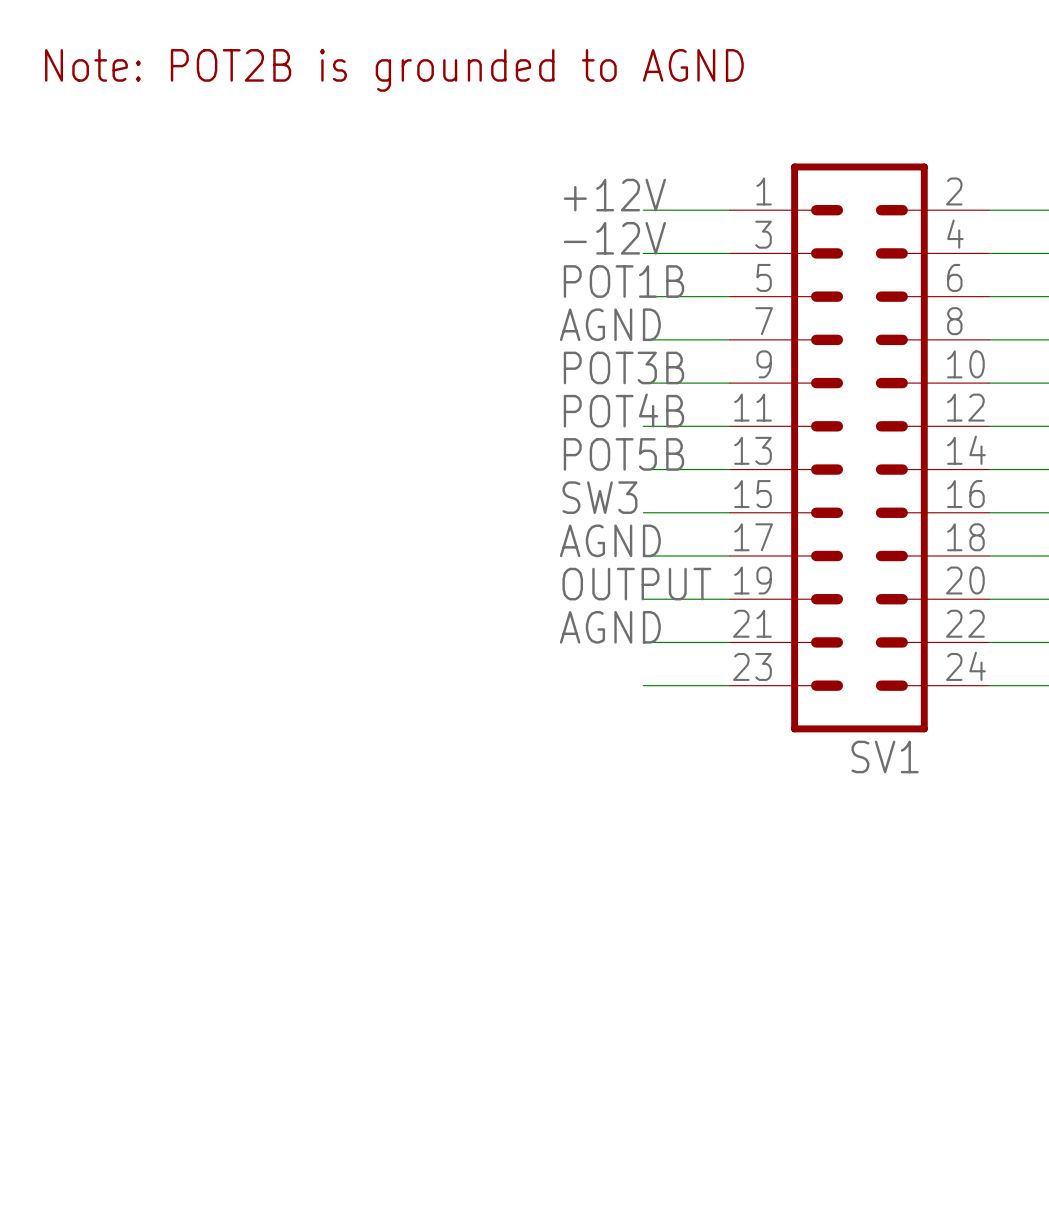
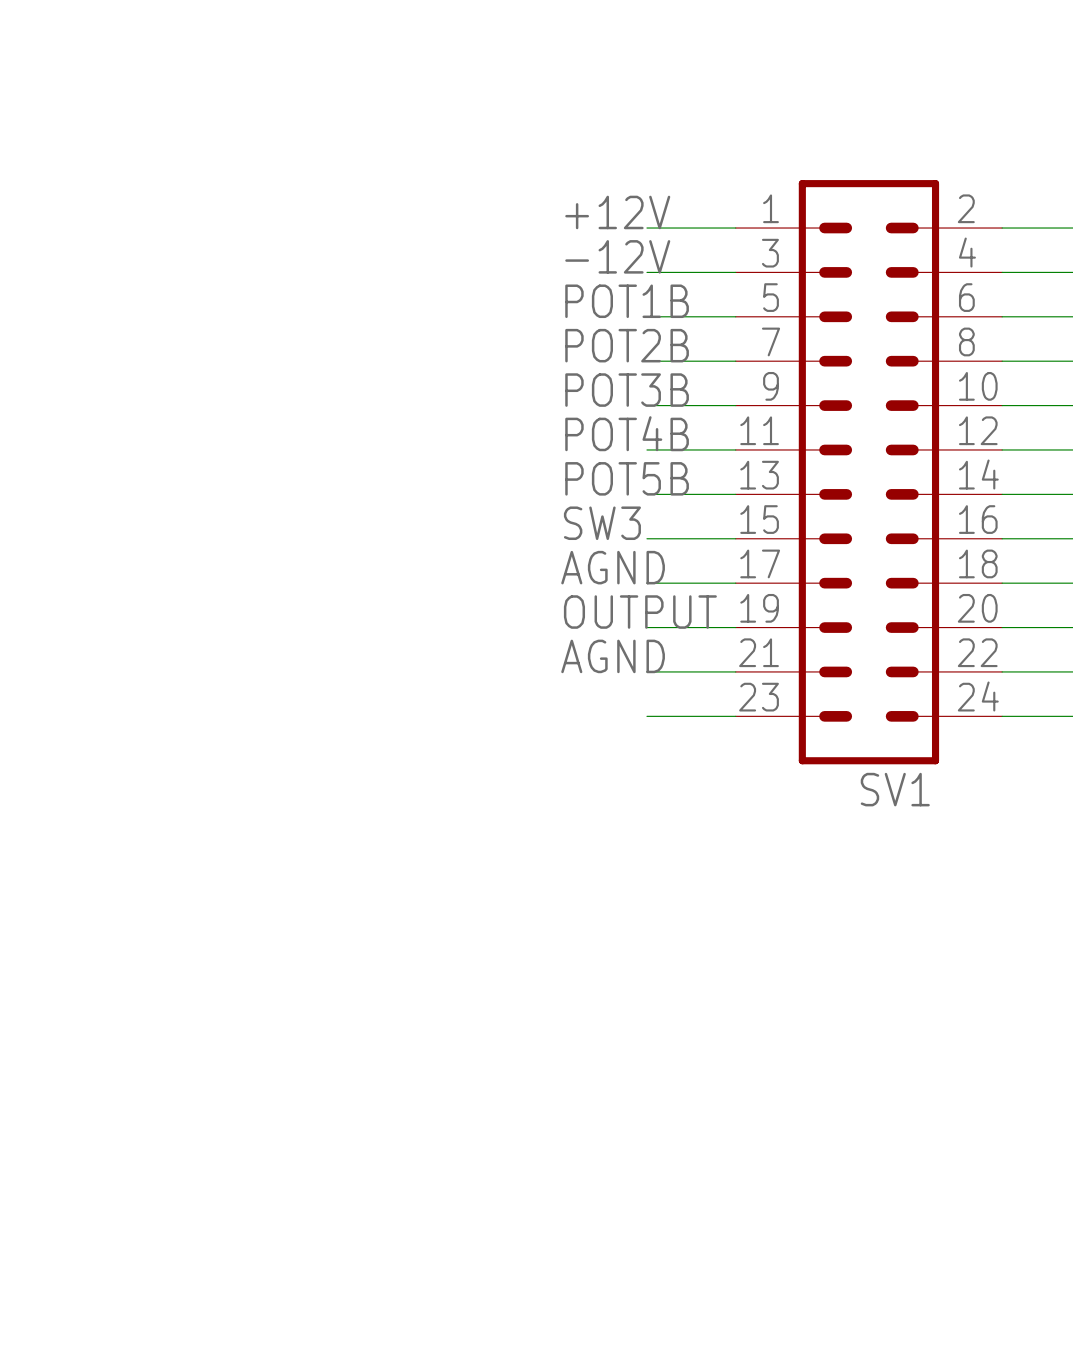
text: Note: POT2B is grounded to AGND (394, 70) -> none
label: AGND (610, 324) -> POT2B (627, 345)

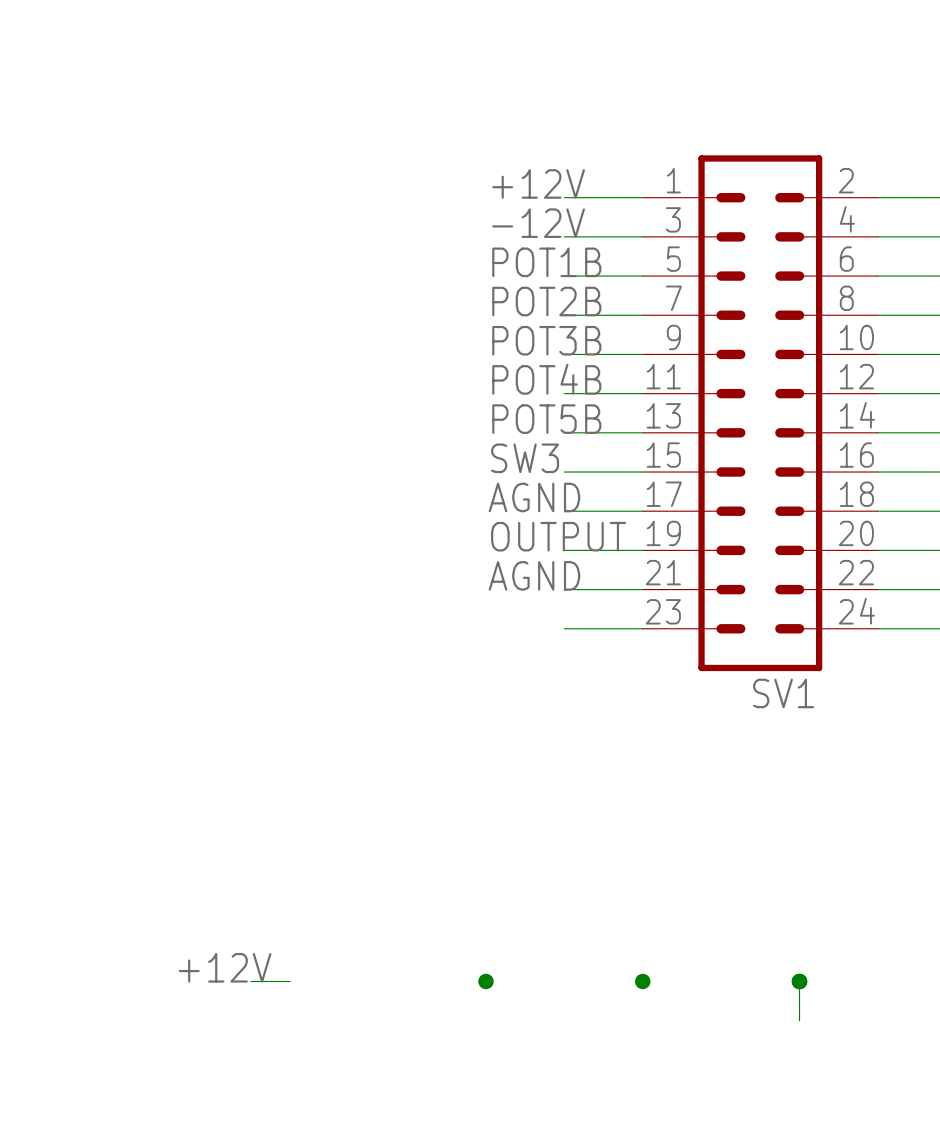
label: none -> +12V (225, 967)
wire: none -> (250, 981) (290, 981)
junction: none -> (485, 981)
junction: none -> (642, 981)
wire: none -> (799, 981) (799, 1020)
junction: none -> (799, 981)

